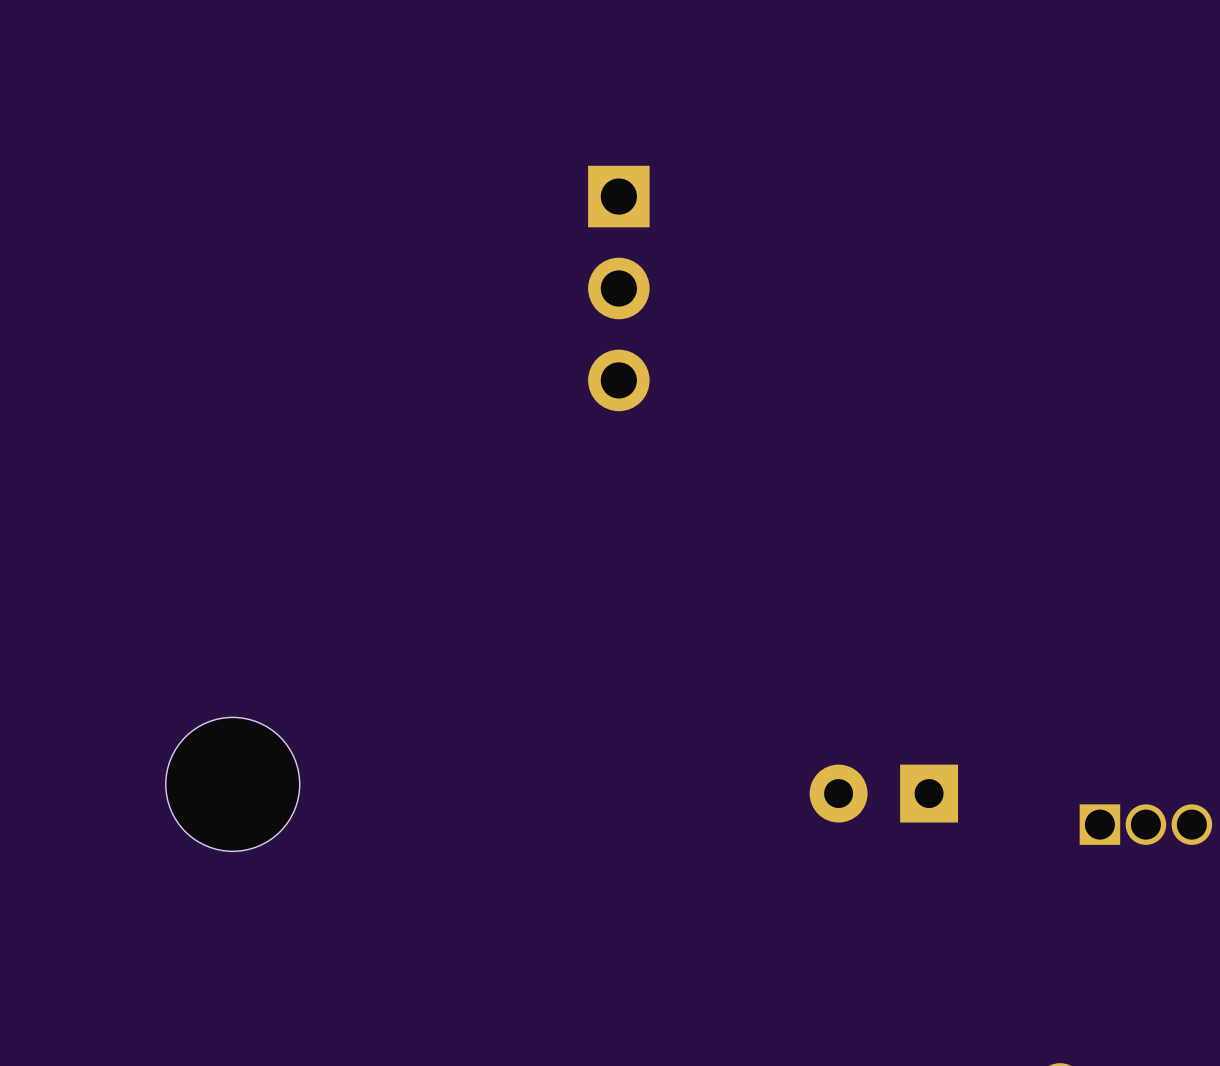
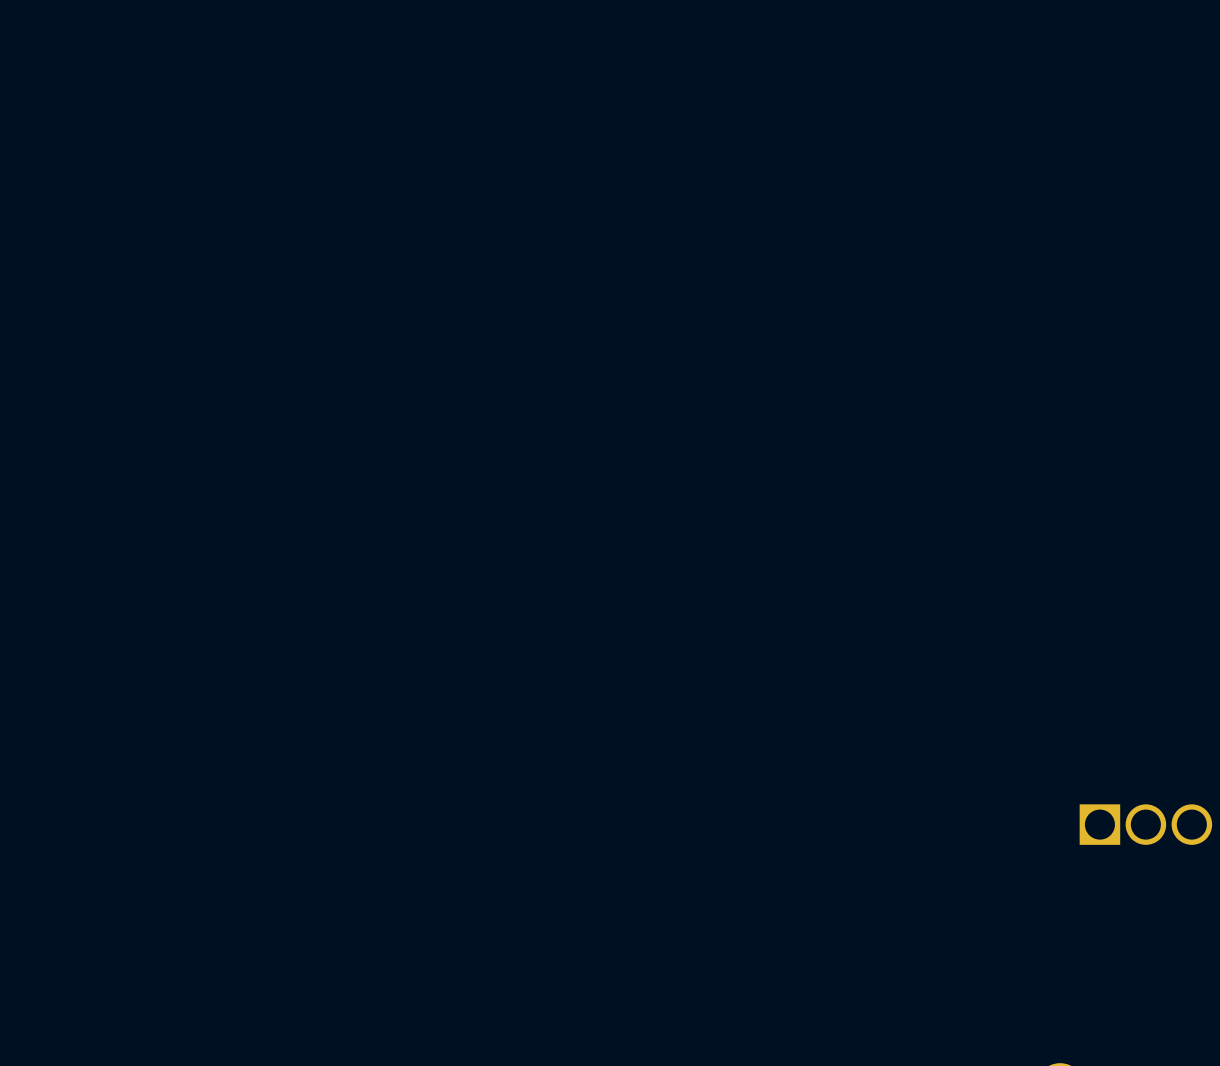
part: (618, 288) -> none
part: (232, 784) -> none
part: (883, 793) -> none

